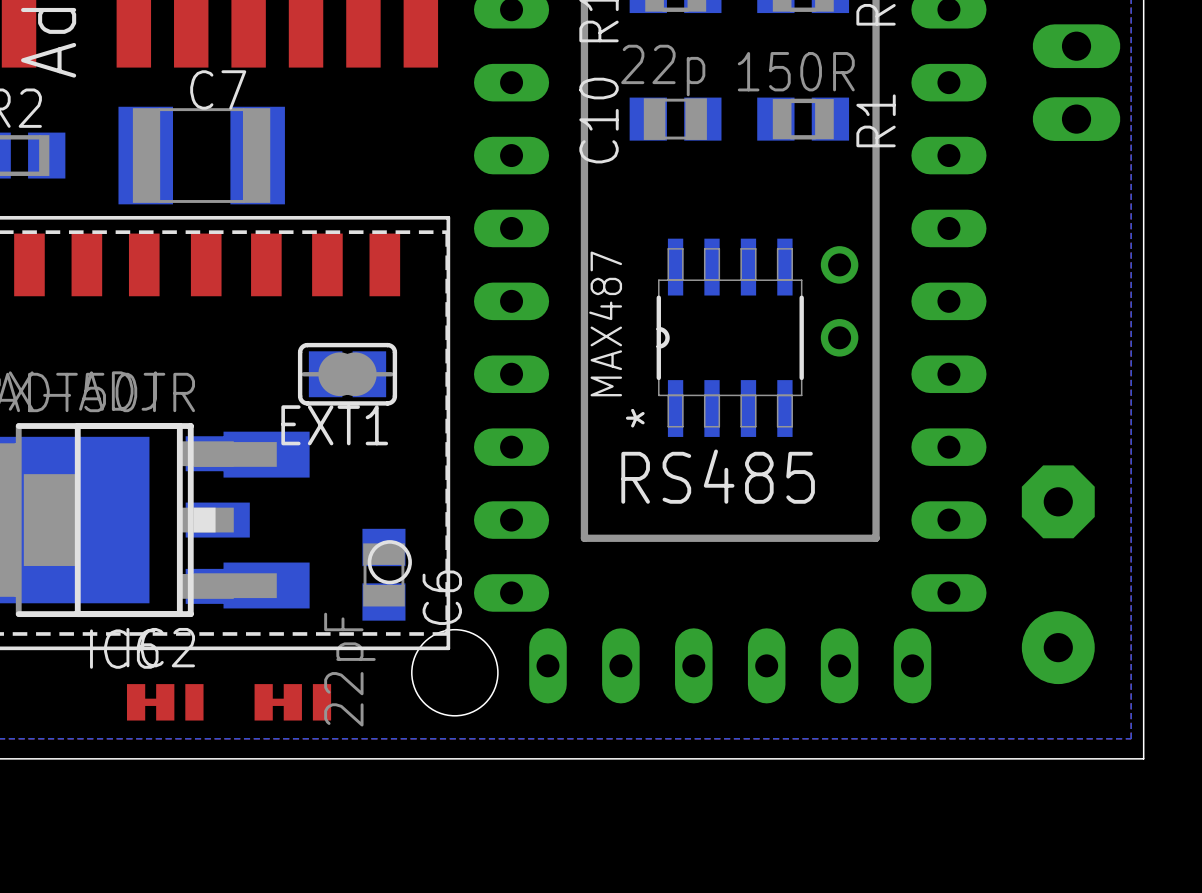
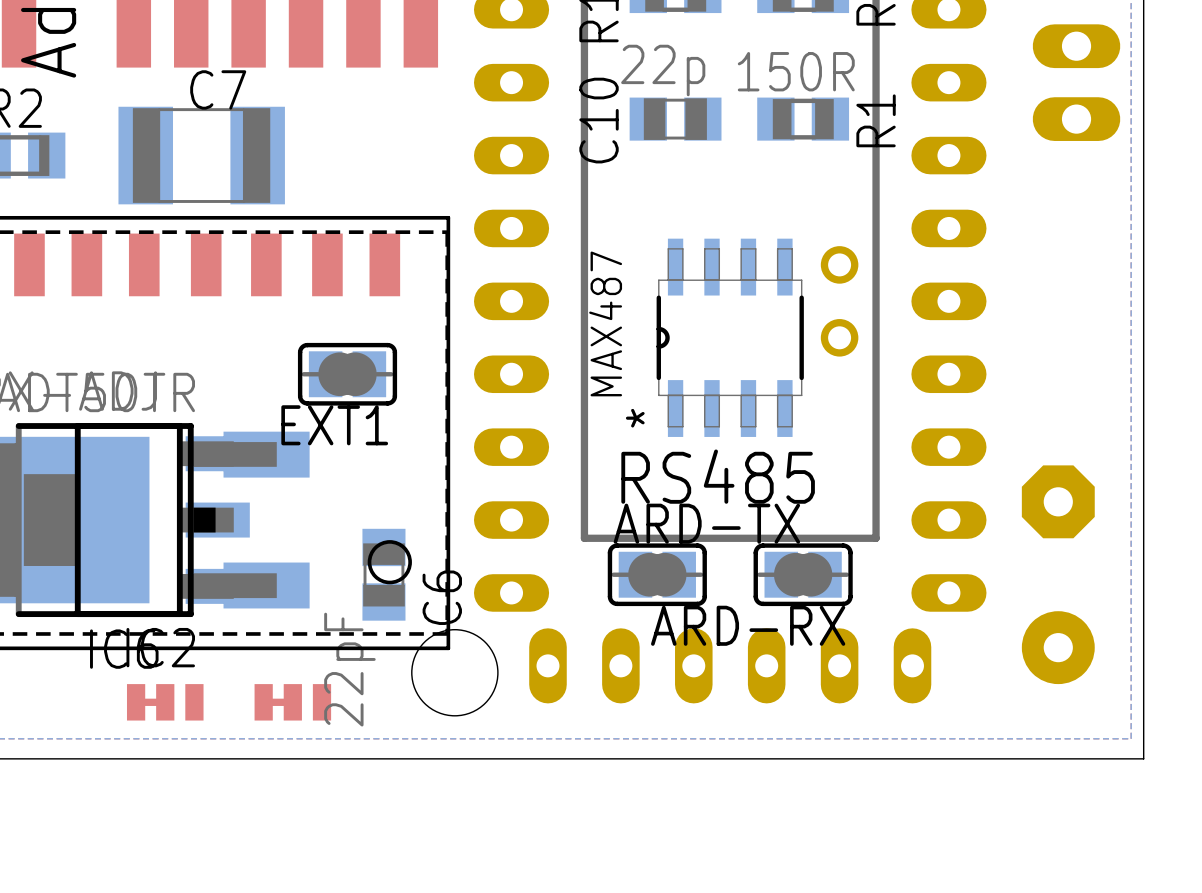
ARD-TX: none -> (657, 574)
ARD-RX: none -> (803, 574)

